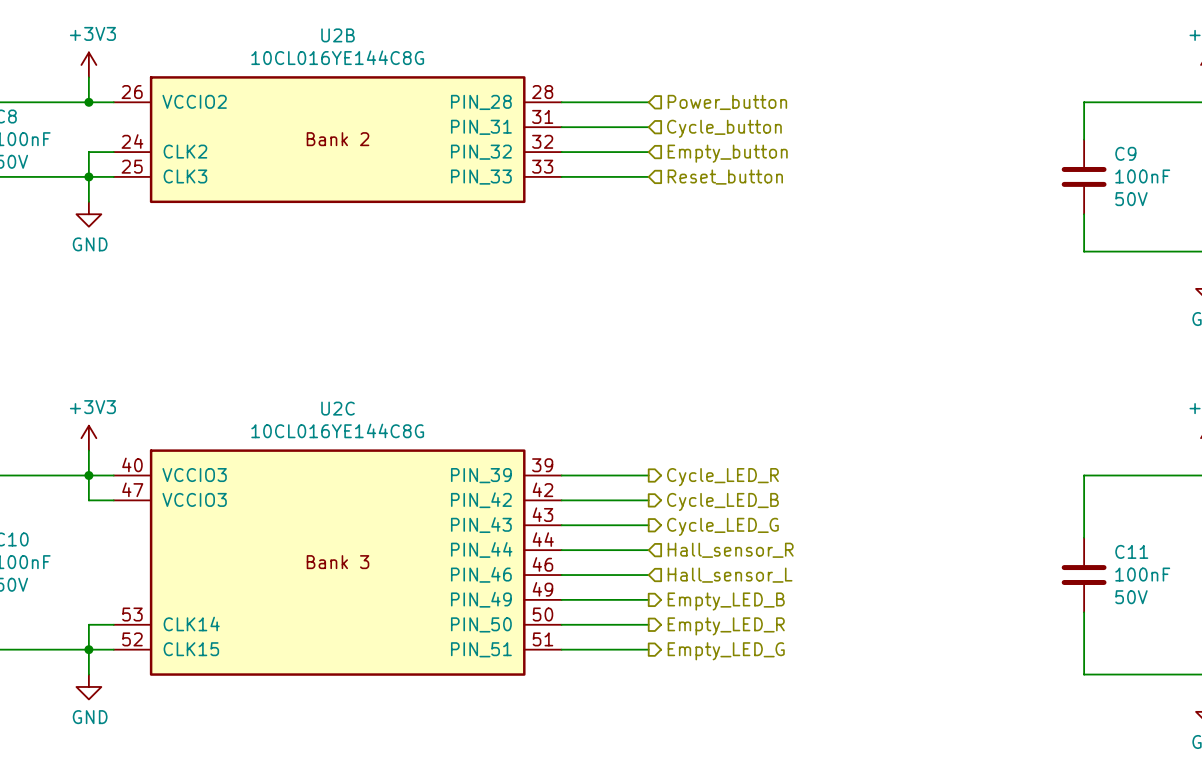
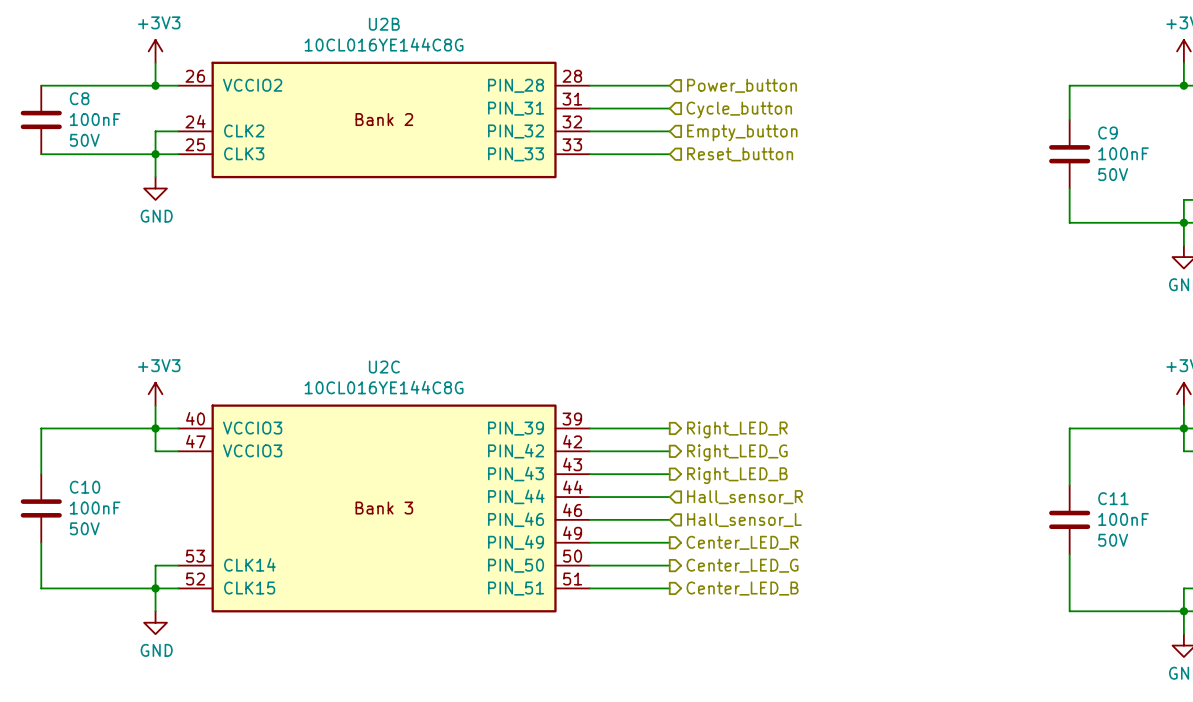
hierarchical label: Cycle_LED_R (722, 477) -> Right_LED_R (737, 429)
hierarchical label: Cycle_LED_B (722, 501) -> Right_LED_G (737, 452)
hierarchical label: Cycle_LED_G (722, 526) -> Right_LED_B (737, 475)
hierarchical label: Empty_LED_B (726, 601) -> Center_LED_R (742, 542)
hierarchical label: Empty_LED_R (726, 626) -> Center_LED_G (742, 565)
hierarchical label: Empty_LED_G (726, 651) -> Center_LED_B (742, 588)

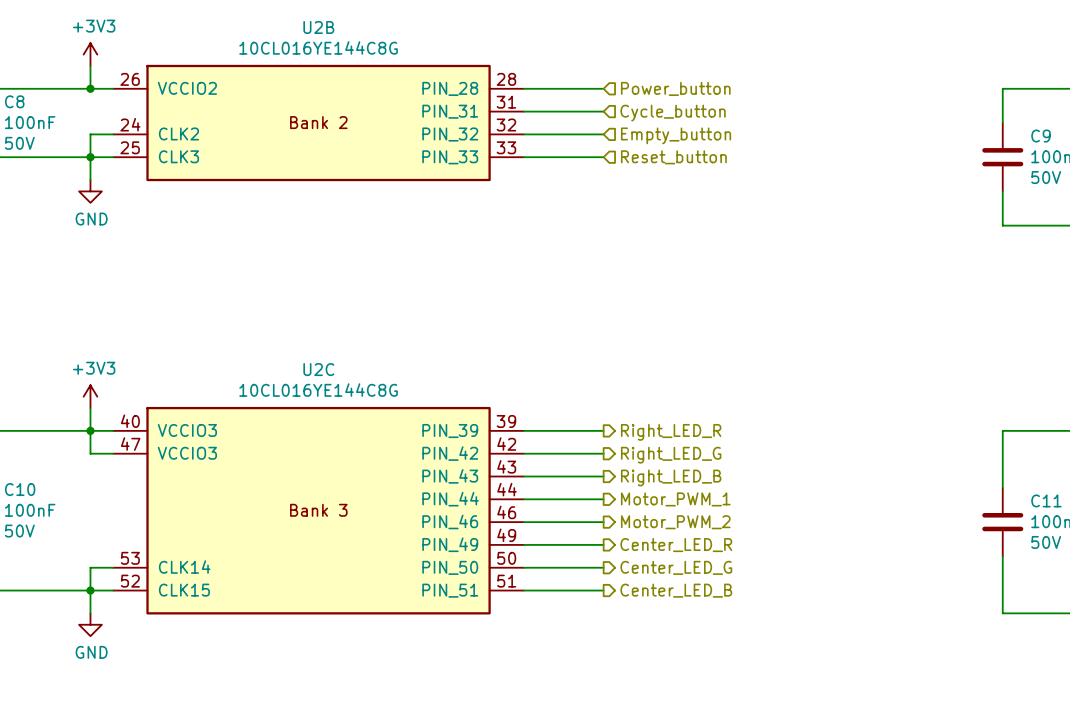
hierarchical label shape: input (745, 497) -> output (675, 499)
hierarchical label: Hall_sensor_R (745, 497) -> Motor_PWM_1 (675, 499)
hierarchical label shape: input (744, 520) -> output (675, 522)
hierarchical label: Hall_sensor_L (744, 520) -> Motor_PWM_2 (675, 522)

